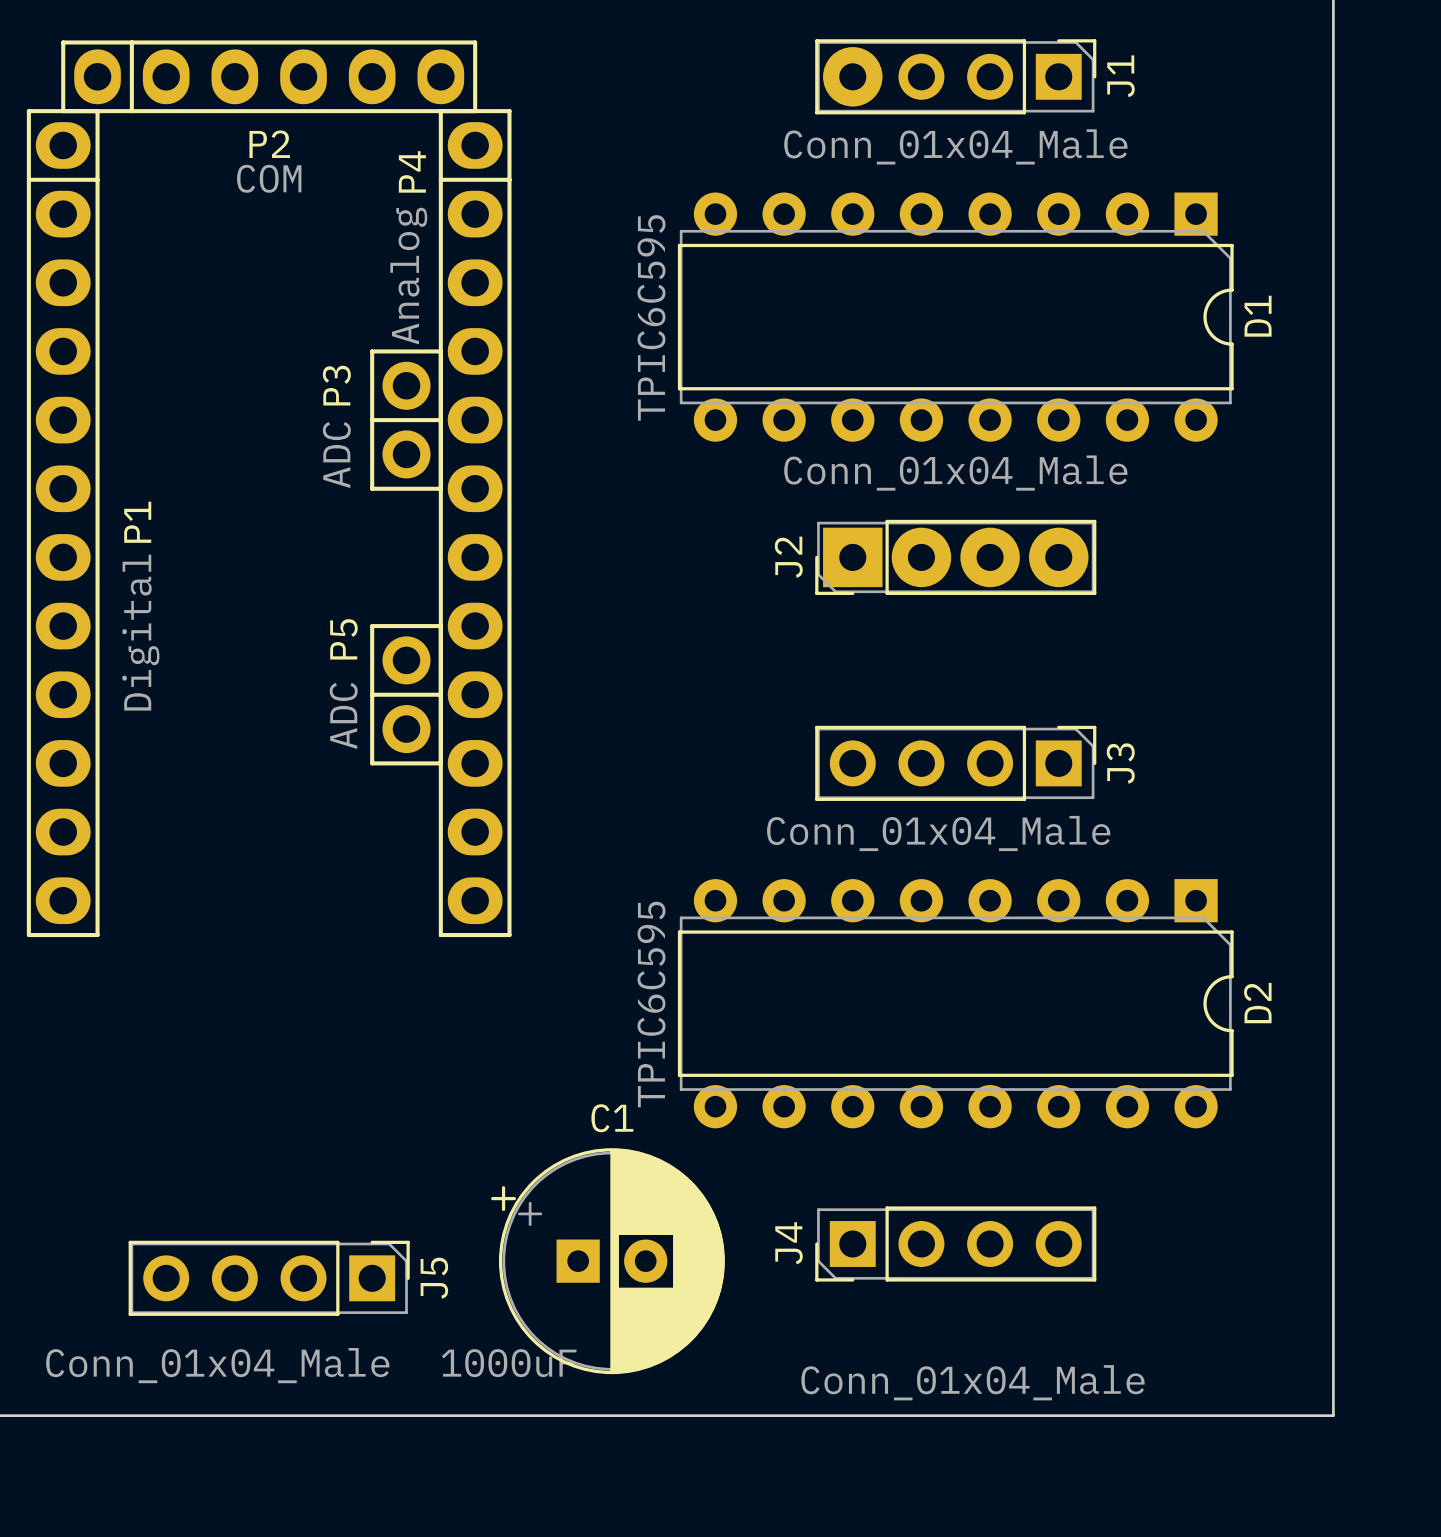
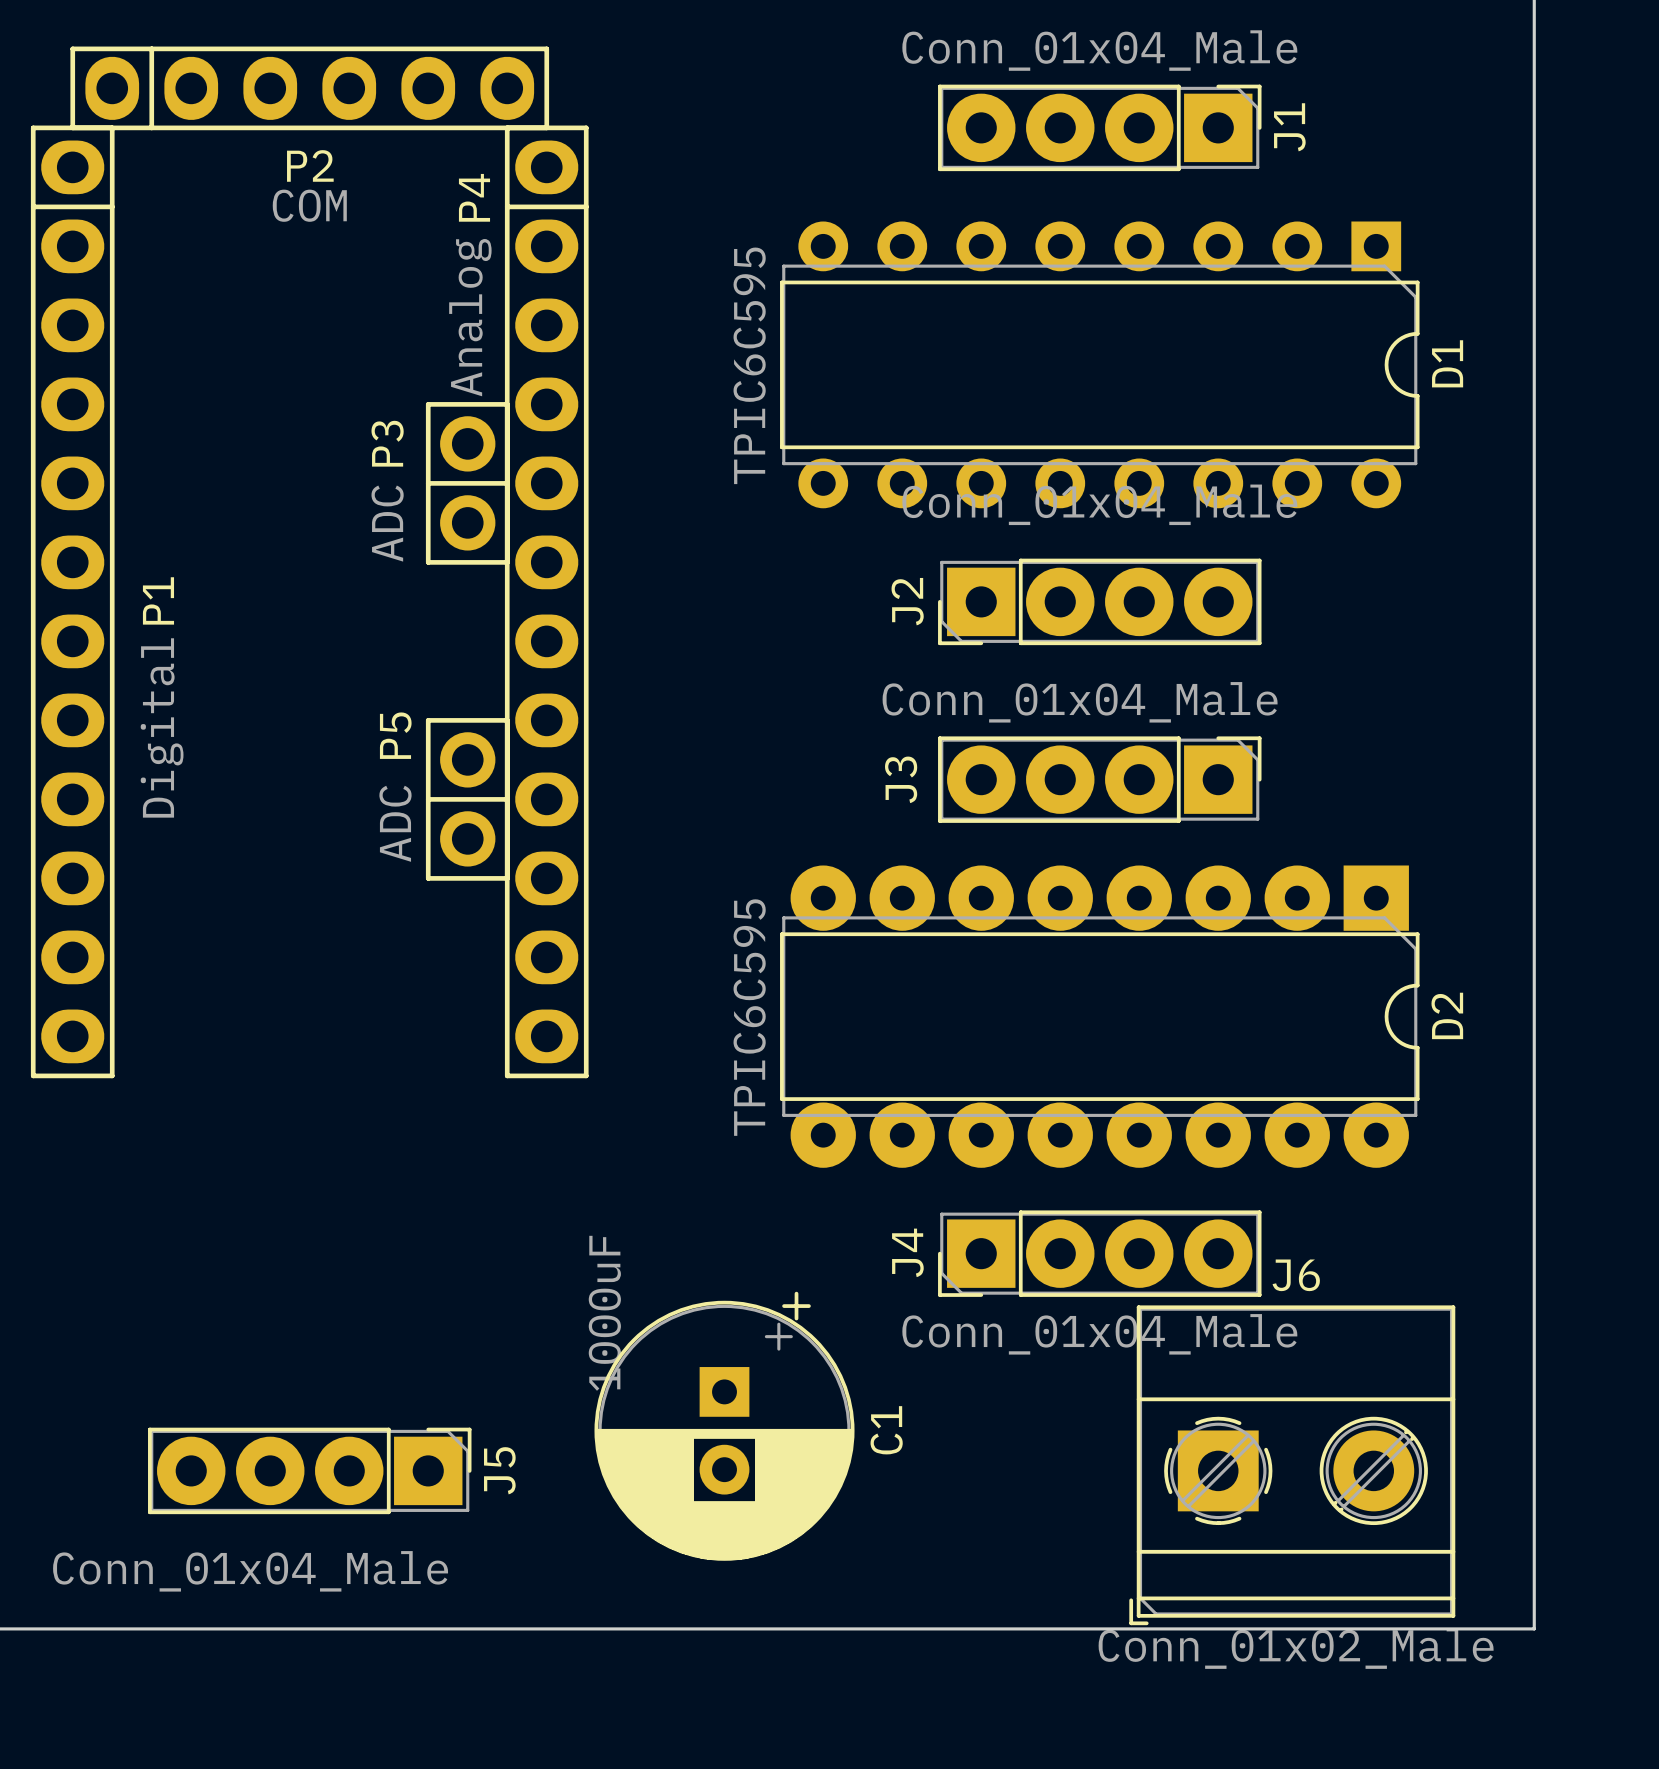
J1 footprint: [815, 39, 1097, 115] -> [938, 84, 1262, 172]
J1 value position: Conn_01x04_Male (955, 146) -> Conn_01x04_Male (1099, 50)
J2 position: (955, 557) -> (1099, 601)
J3 footprint: [815, 725, 1097, 801] -> [938, 736, 1262, 823]
J3 name position: J3 (1120, 763) -> J3 (901, 779)
J3 value position: Conn_01x04_Male (938, 833) -> Conn_01x04_Male (1080, 702)
D2 footprint: [677, 879, 1234, 1129] -> [780, 865, 1420, 1168]
J4 footprint: [815, 1206, 1097, 1282] -> [938, 1210, 1262, 1297]
J5 footprint: [128, 1240, 410, 1316] -> [148, 1427, 472, 1515]
C1 rotation: 0° (608, 1261) -> 90° clockwise (724, 1426)
J6: none -> Conn_01x02_Male (1292, 1465)
J4 value position: Conn_01x04_Male (972, 1382) -> Conn_01x04_Male (1099, 1334)

